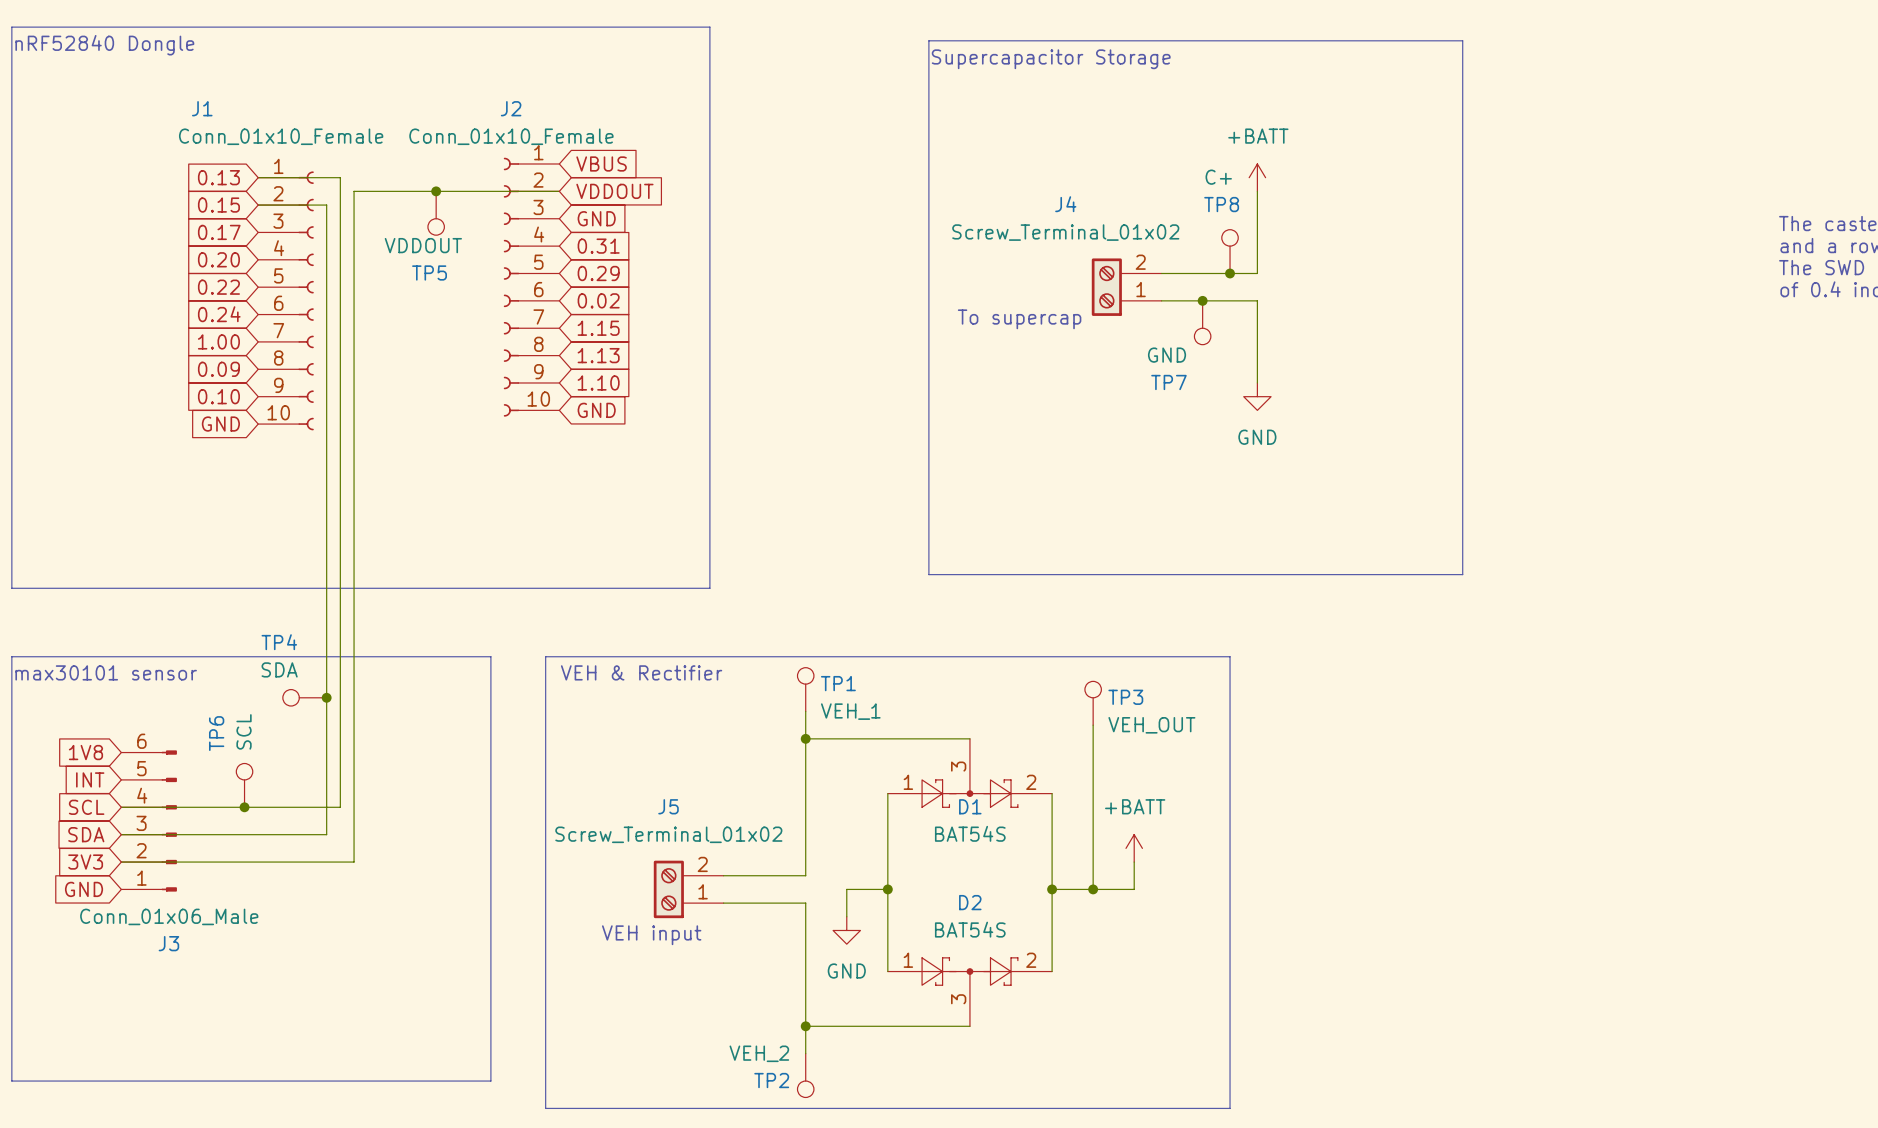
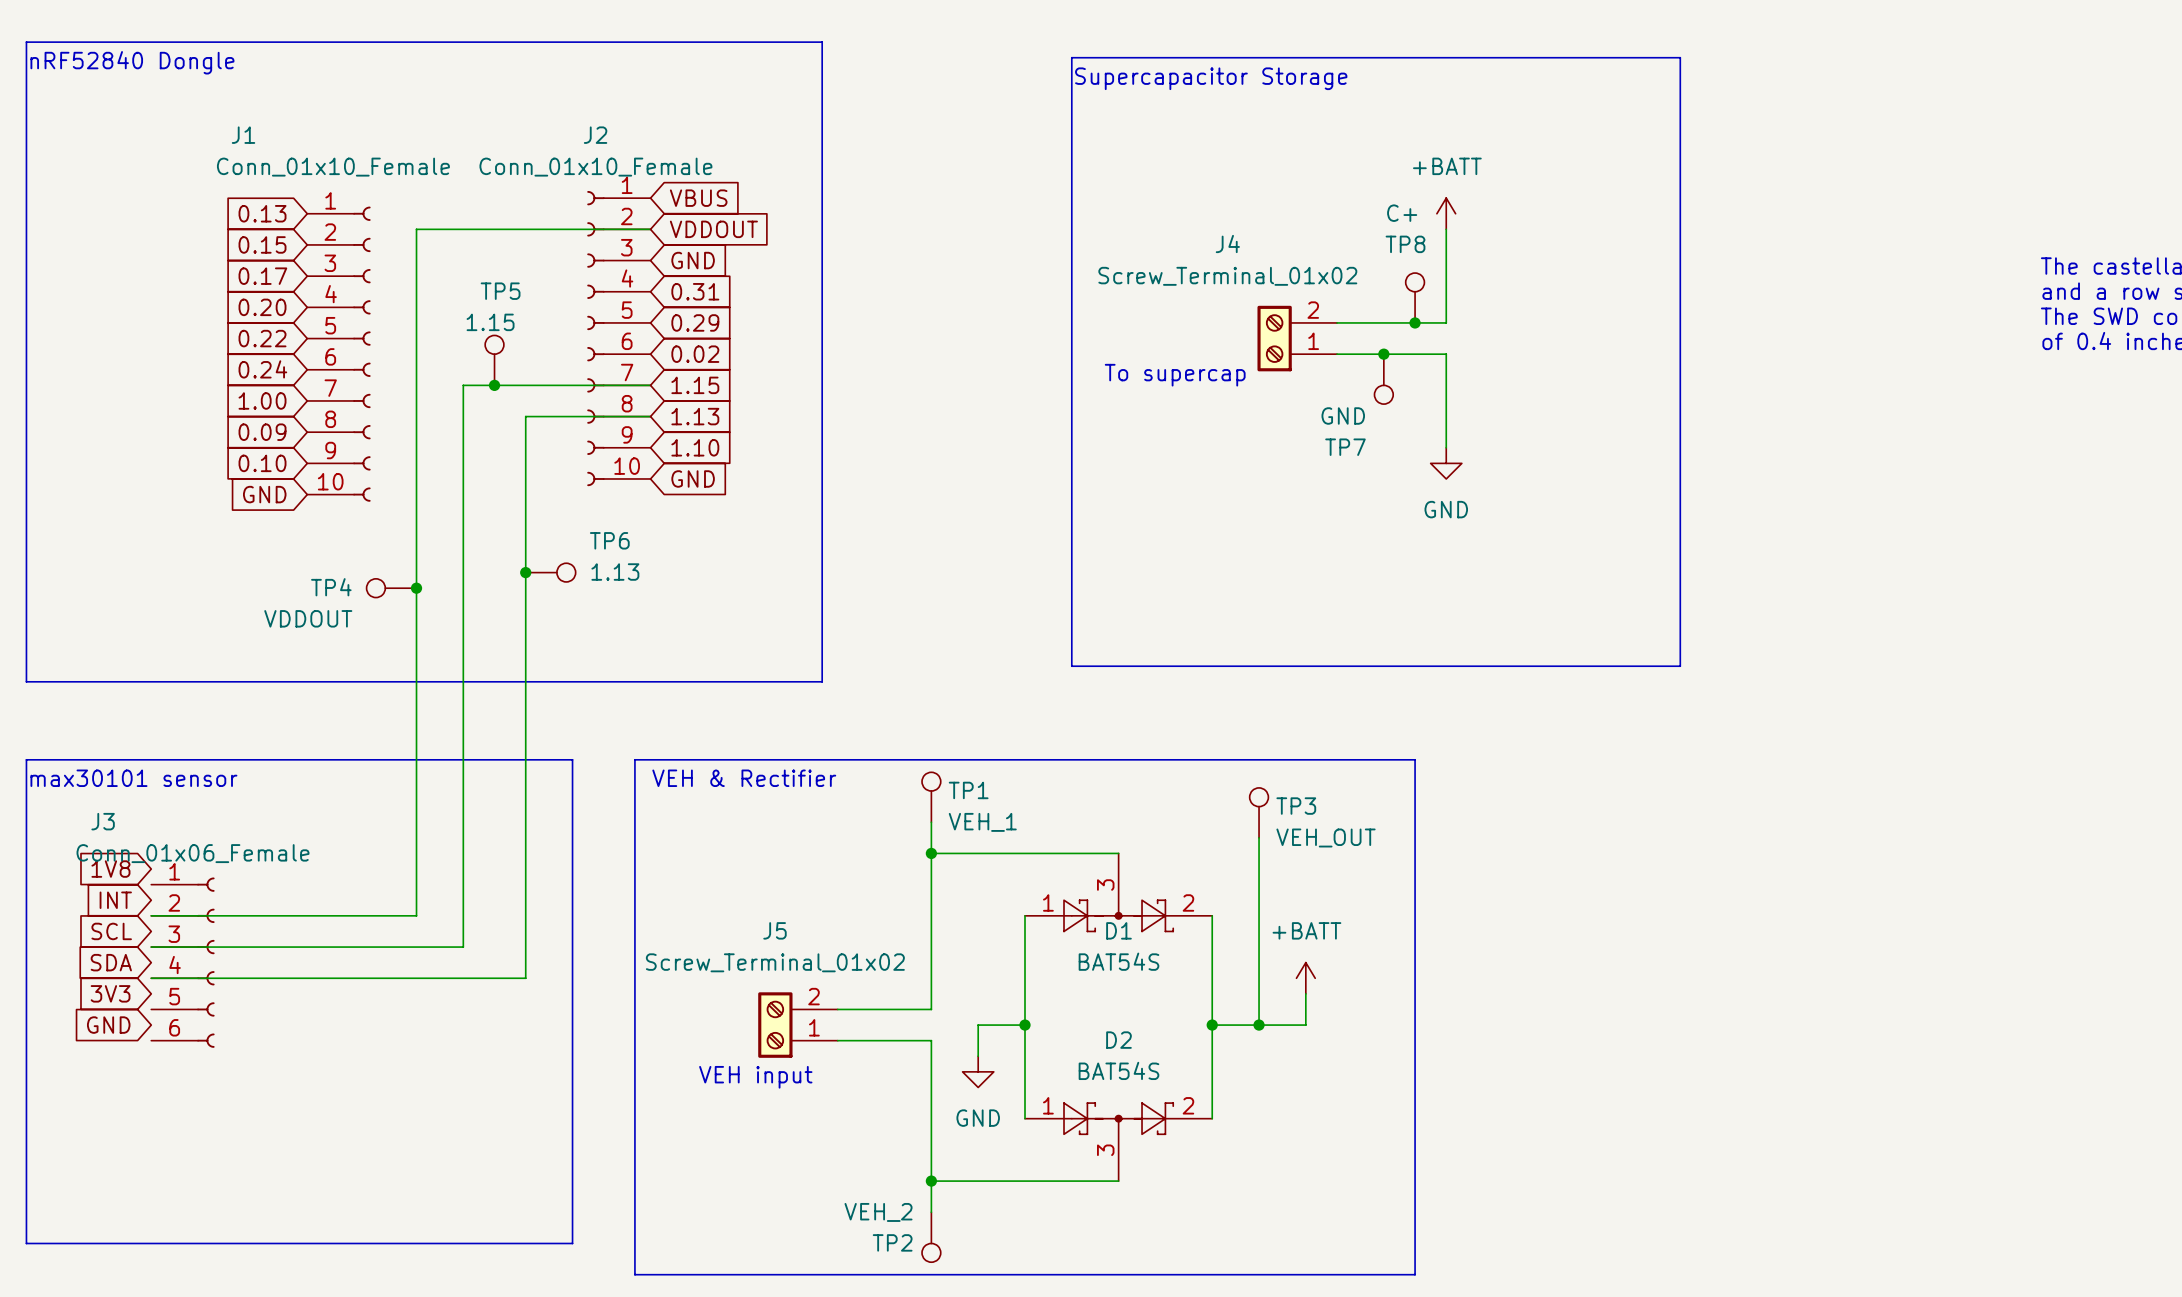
wire: (258, 177) (340, 177) (340, 807) (121, 807) -> none
junction: (436, 191) -> none
wire: (258, 205) (326, 205) (326, 834) (121, 834) -> none
TP5 position: (436, 213) -> (494, 360)
TP5 rotation: 0° (436, 226) -> 180° (494, 344)
TP5 value: VDDOUT (423, 245) -> 1.15 (490, 322)
junction: none -> (494, 385)
wire: none -> (650, 385) (463, 385) (463, 947) (151, 947)
wire: none -> (650, 416) (525, 416) (525, 978) (151, 978)
junction: none -> (525, 572)
junction: none -> (416, 588)
TP4 name position: TP4 (279, 642) -> TP4 (331, 587)
TP4 value: SDA (279, 669) -> VDDOUT (308, 618)
TP4 position: (304, 697) -> (391, 588)
junction: (326, 697) -> none
TP6 value: SCL (244, 731) -> 1.13 (615, 572)
J3 symbol: [121, 750, 177, 892] -> [151, 877, 215, 1048]
TP6 rotation: 0° (244, 771) -> 90° clockwise (566, 572)
TP6 position: (244, 785) -> (550, 572)
wire: (354, 793) (354, 862) (121, 862) -> (416, 915) (151, 915)
junction: (244, 807) -> none
J3 value: Conn_01x06_Male (169, 916) -> Conn_01x06_Female (193, 853)
J3 name position: J3 (168, 943) -> J3 (103, 821)

